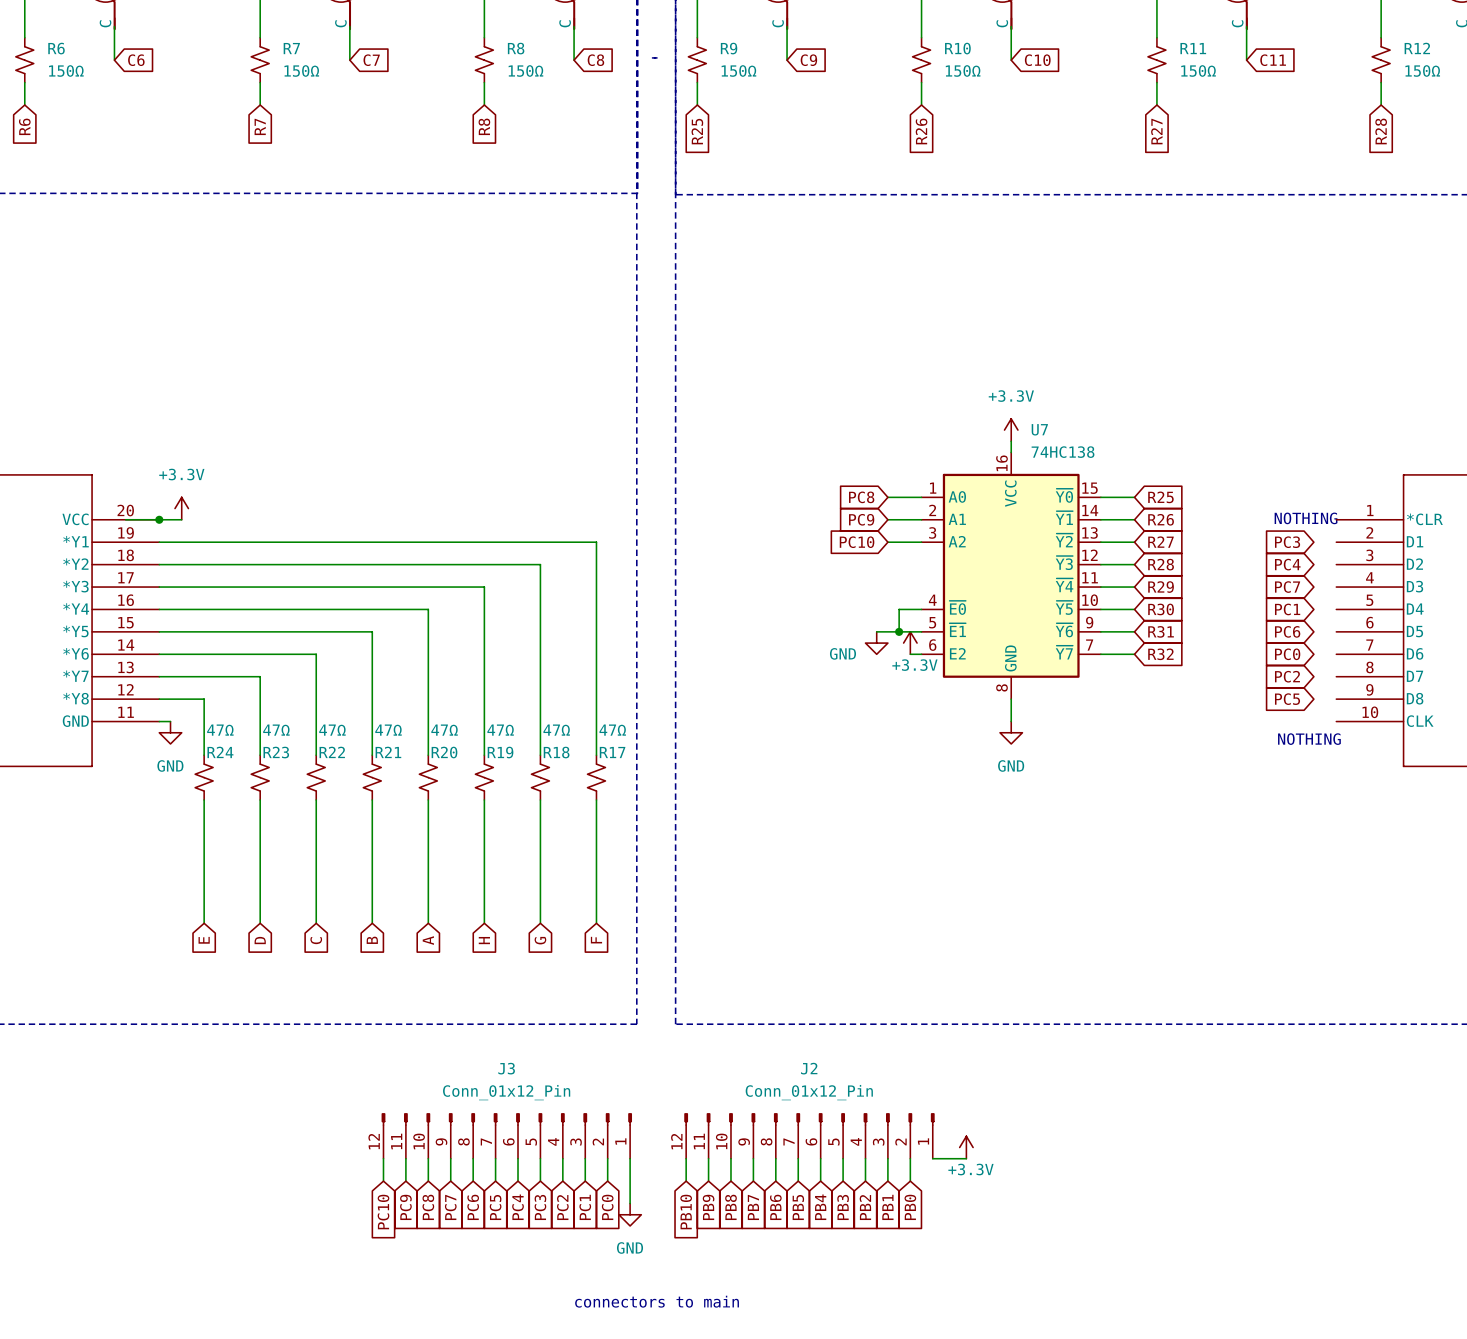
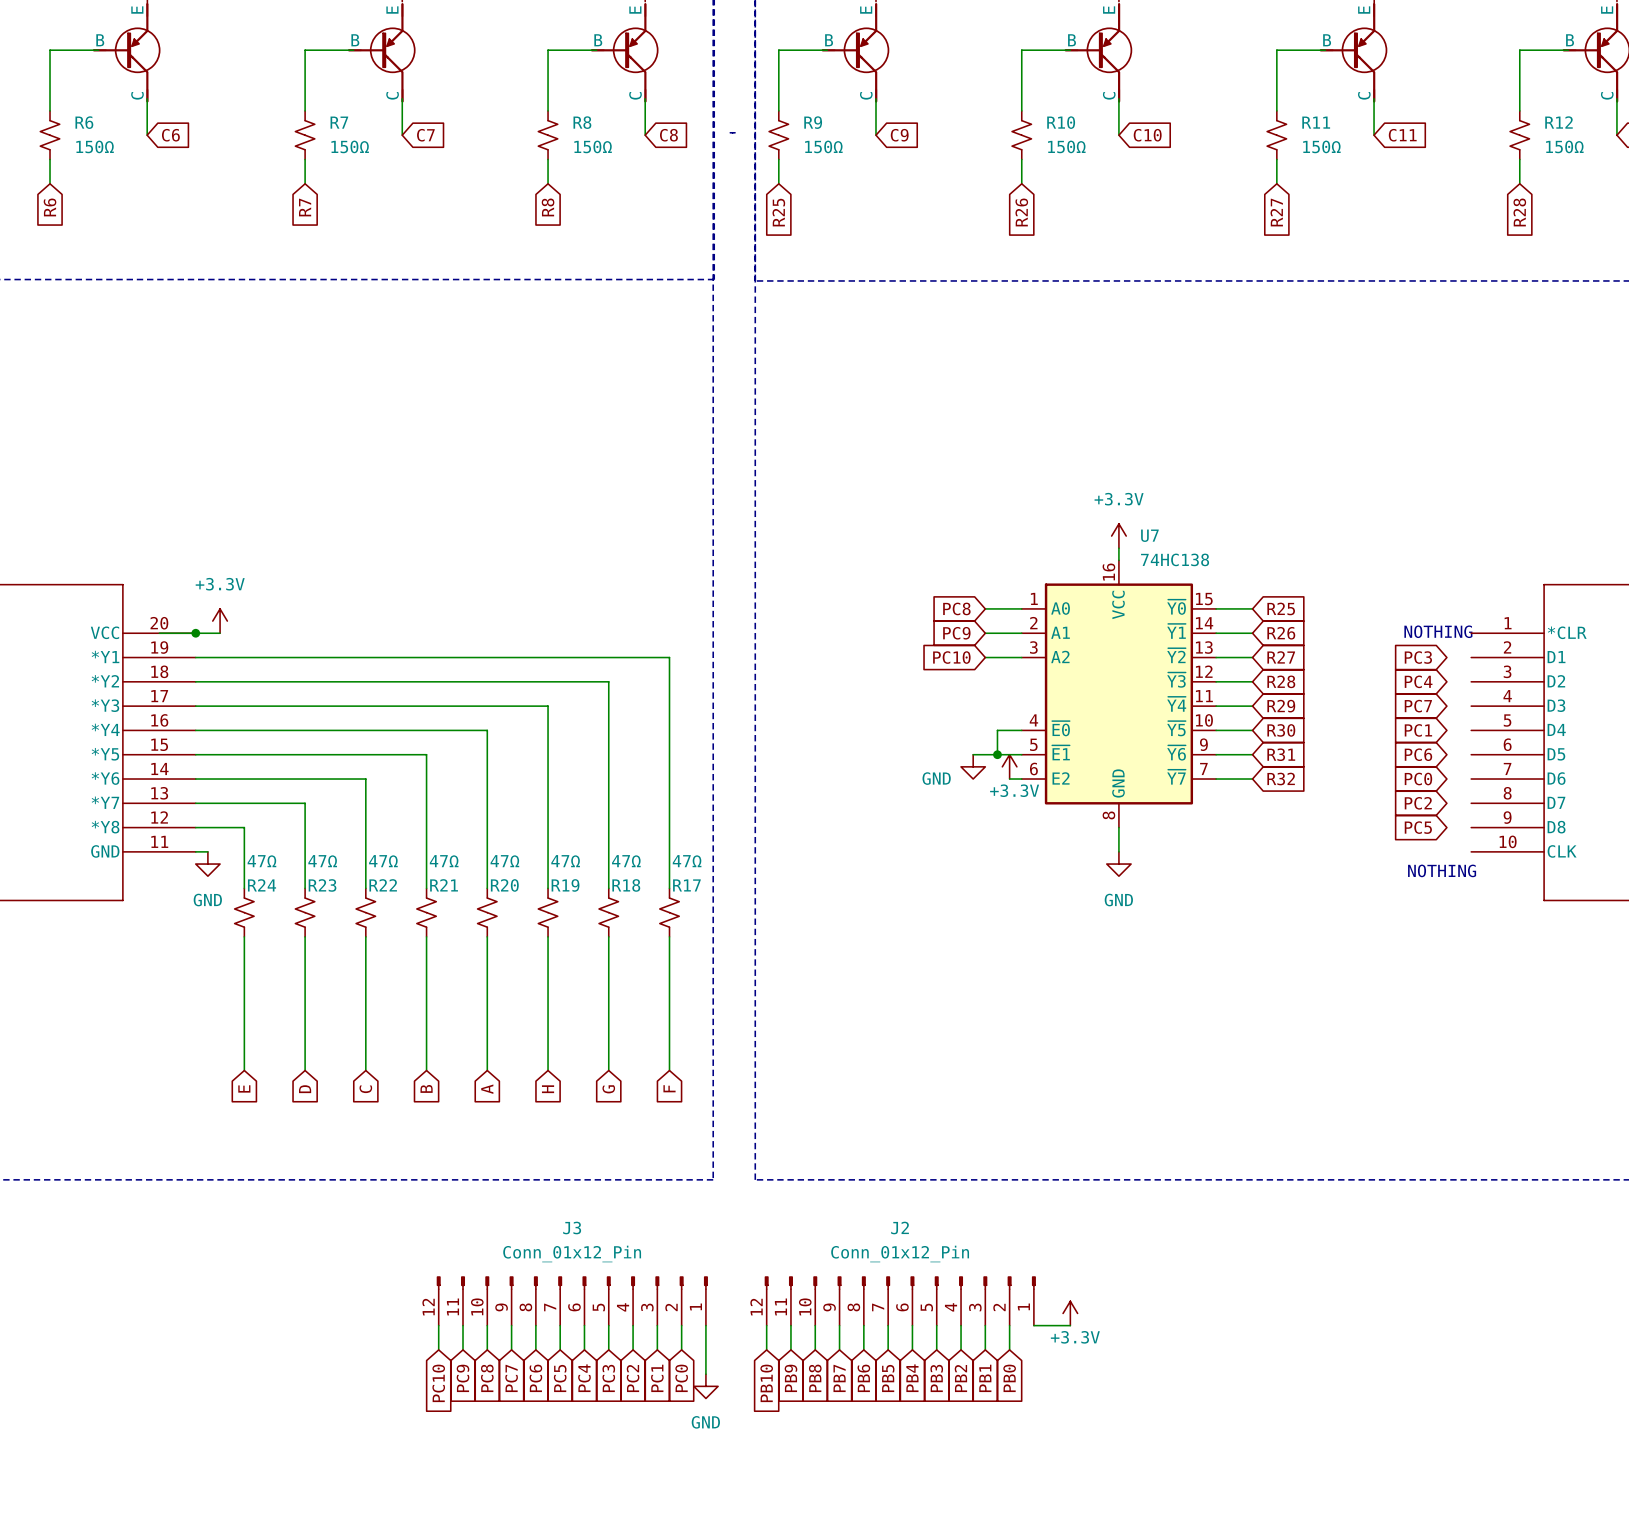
text: connectors to main (657, 1301) -> none

